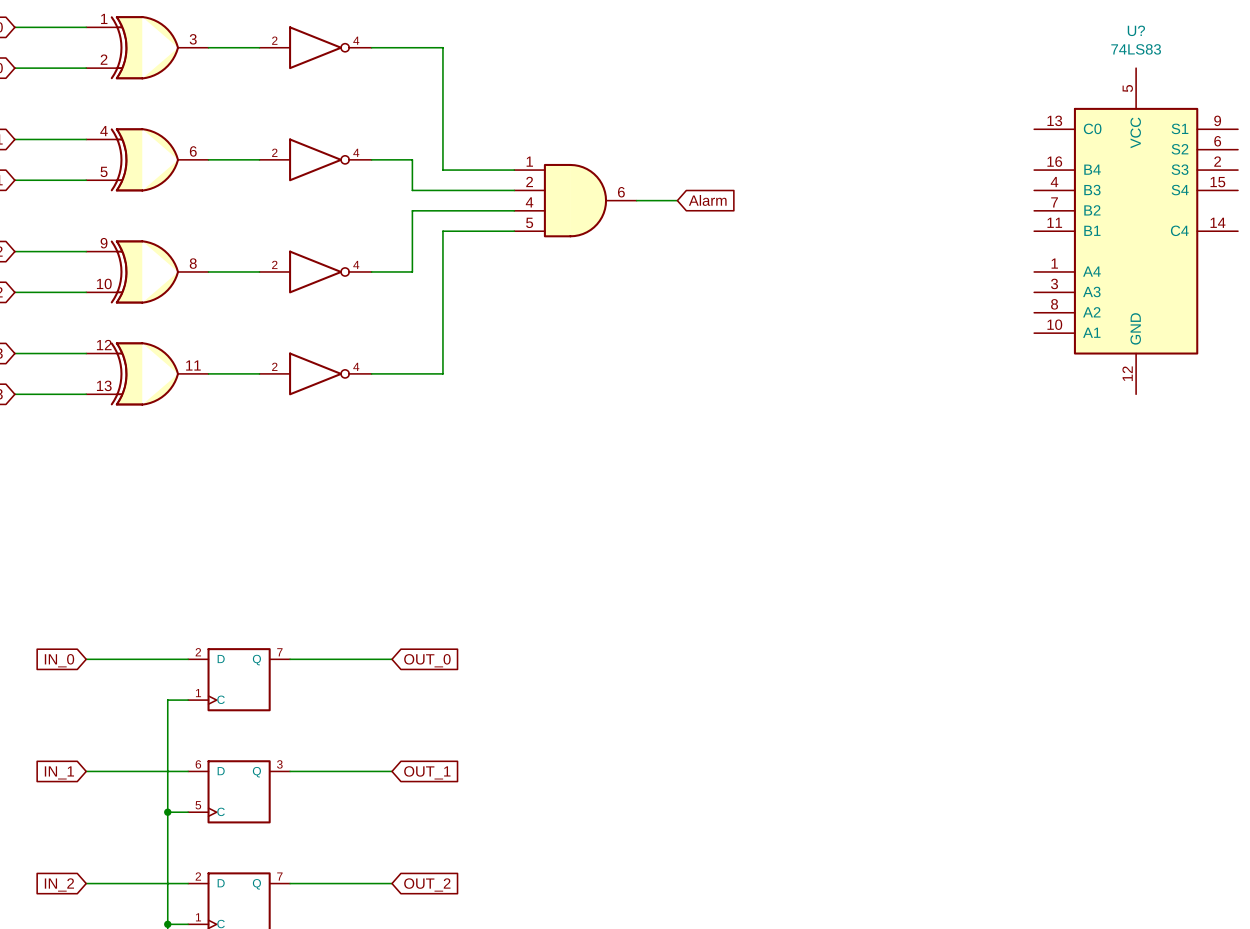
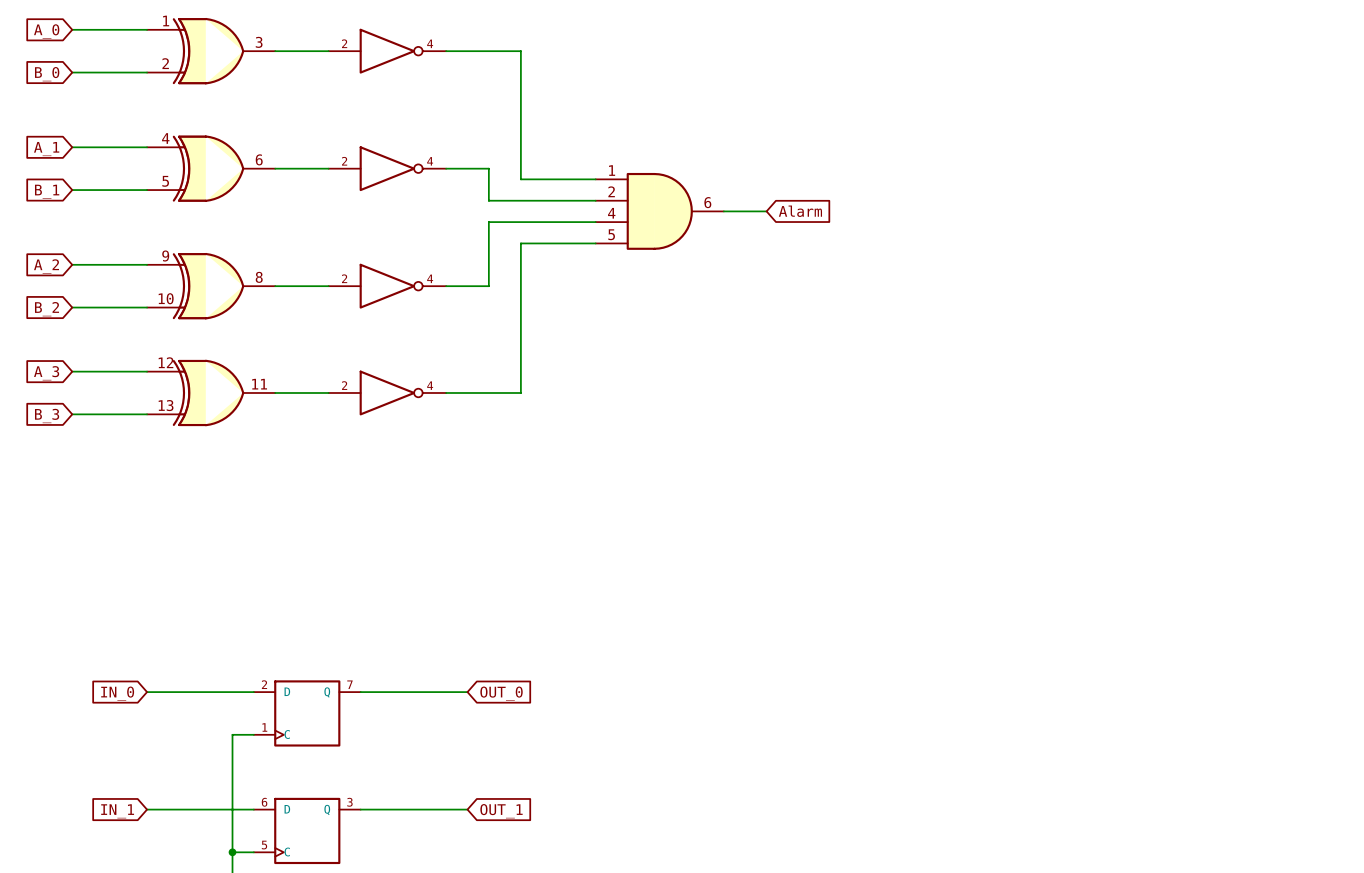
U?: 74LS83 (1136, 231) -> none

